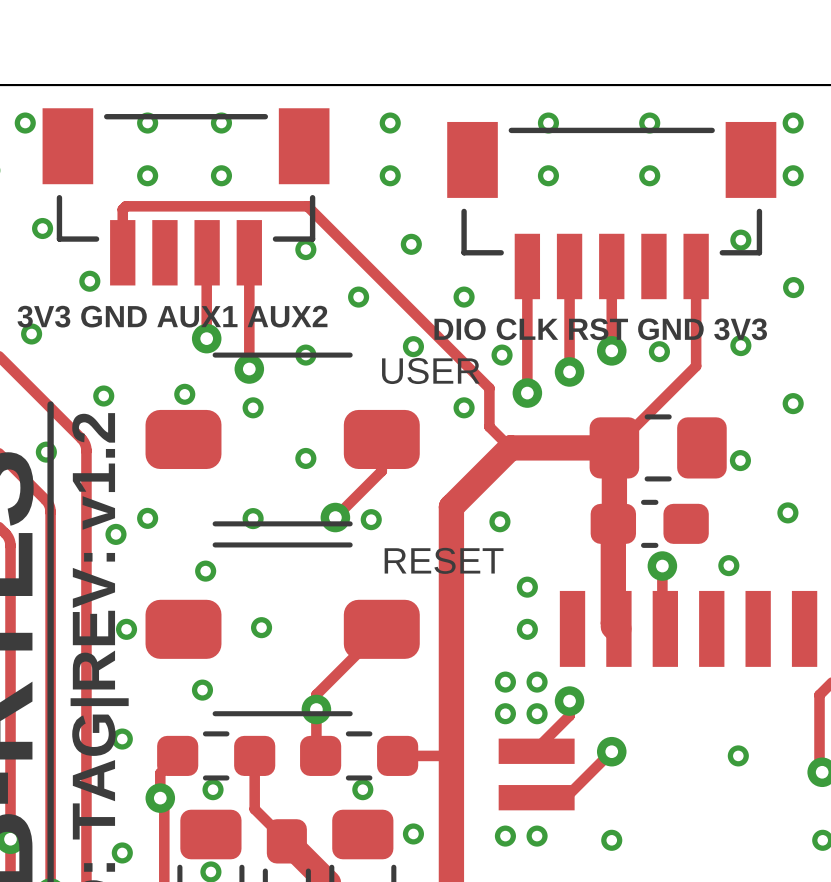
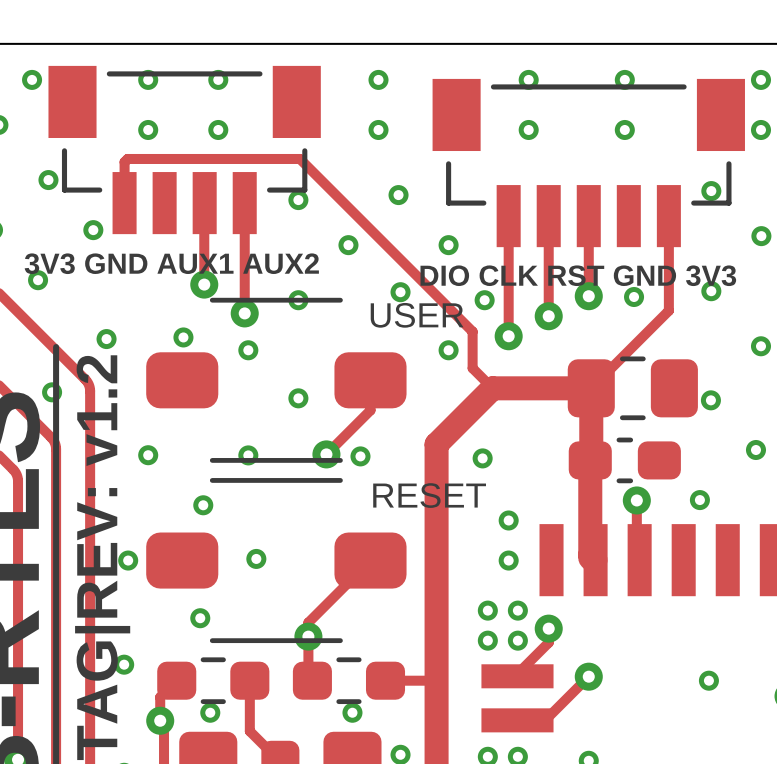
via: (115, 534) -> none

